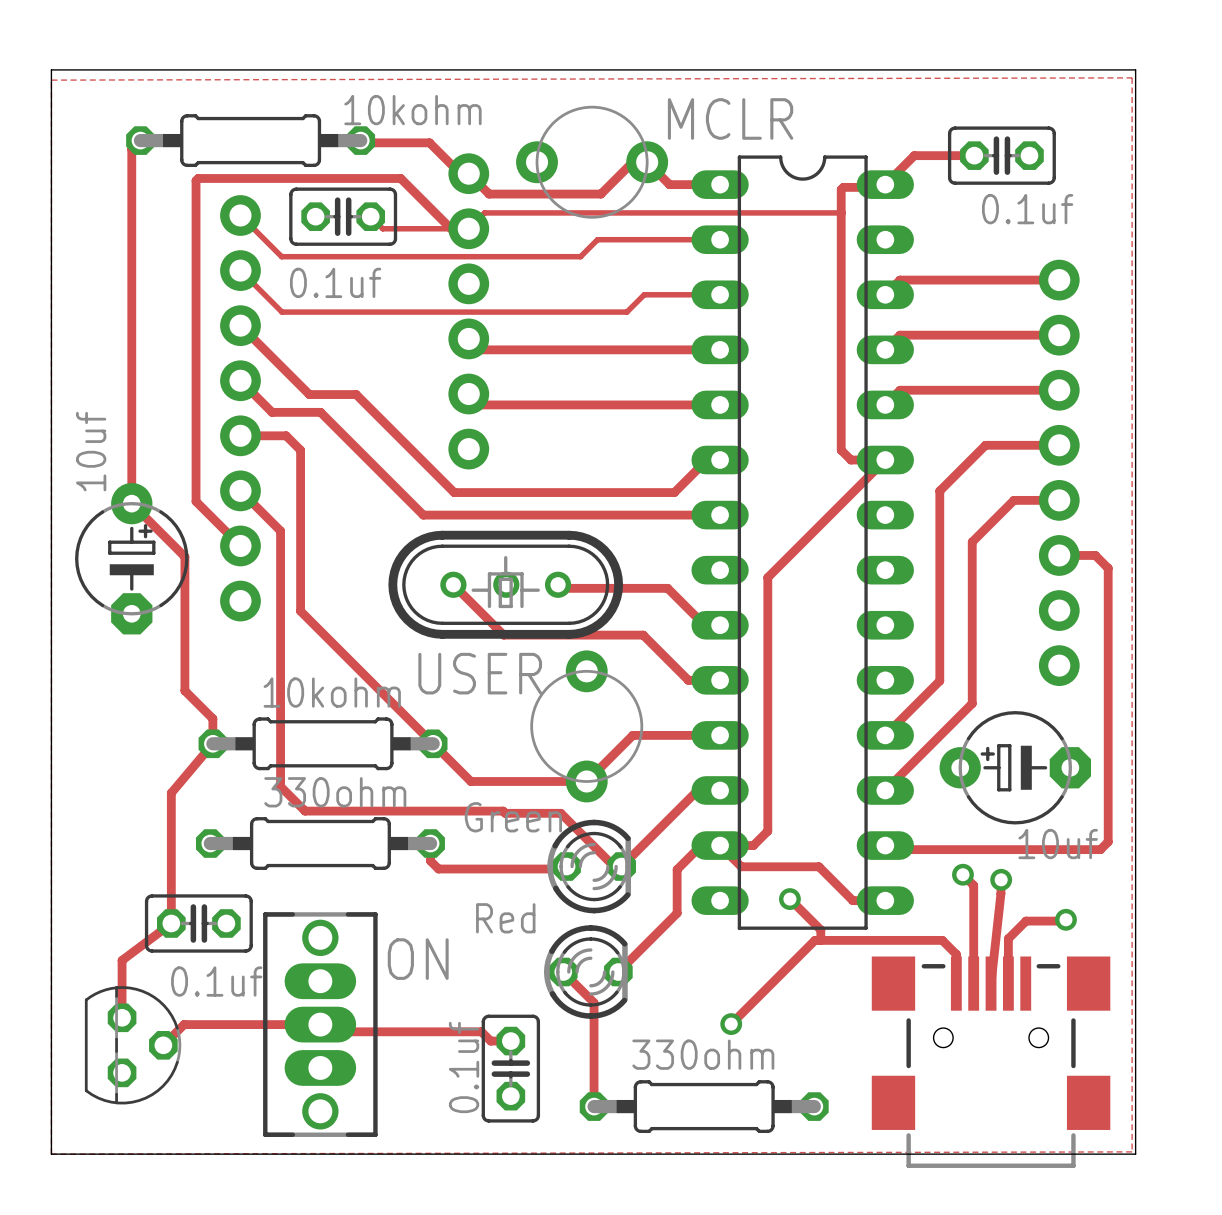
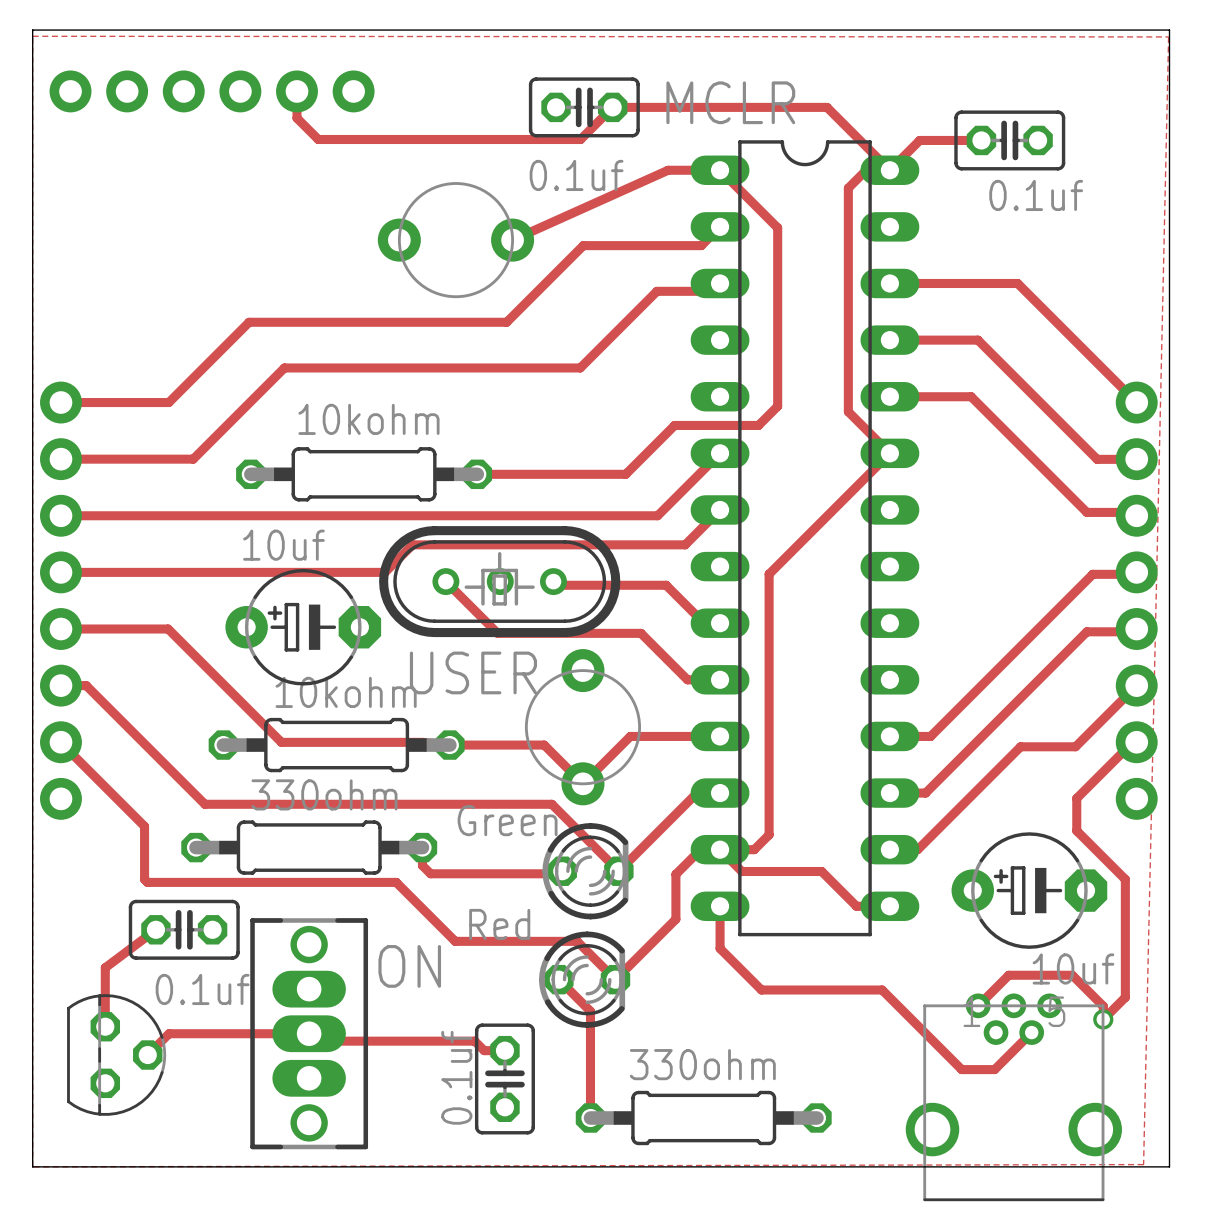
board edge: (51, 69) (1135, 69) (1135, 1154) -> (32, 52) (32, 30) (1169, 30) (1169, 1166) (1147, 1166)
zone outline: (51, 80) (1132, 77) (1132, 1151) -> (32, 62) (32, 36) (1168, 36) (1143, 1164)
track: (140, 140) (131, 149) (131, 503) (184, 556) (184, 690) (212, 718) (212, 743) (171, 793) (171, 923) -> none
part: 10kohm (250, 140) -> none
track: (360, 140) (363, 142) (429, 142) (464, 177) (468, 173) (489, 194) (600, 194) (632, 162) (647, 162) (669, 184) -> (512, 240) (668, 170)
part position: (592, 162) -> (455, 240)
track: none -> (720, 170) (777, 227) (777, 406) (758, 425) (674, 425) (625, 474) (477, 474)
track: (885, 184) (882, 187) (843, 187) (841, 189) (841, 450) (851, 460) (885, 460) -> (296, 91) (296, 118) (318, 139) (580, 139) (612, 107) (827, 107) (889, 170) (866, 170) (848, 188) (848, 411) (889, 453)
track: (841, 212) (484, 212) (468, 228) -> none
track: (240, 215) (281, 256) (580, 256) (597, 239) (720, 239) -> (60, 402) (168, 402) (249, 322) (506, 322) (583, 245) (701, 245) (720, 226)
part position: (343, 216) -> (584, 107)
track: (370, 216) (382, 228) (468, 228) -> none
track: (468, 228) (462, 239) (400, 178) (198, 178) (196, 180) (196, 501) (240, 545) -> none
track: (240, 270) (281, 312) (626, 312) (644, 294) (720, 294) -> (60, 459) (193, 459) (284, 367) (580, 367) (656, 291) (712, 291) (720, 283)
track: (1059, 280) (900, 280) (885, 294) -> (1136, 402) (1017, 283) (889, 283)
part rotation: 0° (468, 311) -> 90° clockwise (212, 91)
part position: (468, 311) -> (212, 91)
track: (240, 325) (309, 394) (356, 394) (454, 492) (674, 492) (706, 460) (720, 460) -> (60, 515) (657, 515) (720, 453)
track: (1059, 335) (900, 335) (885, 349) -> (1136, 459) (1097, 459) (977, 340) (889, 340)
track: (468, 338) (479, 349) (720, 349) -> none
track: (240, 380) (272, 412) (320, 412) (423, 515) (720, 515) -> (60, 572) (385, 572) (412, 544) (685, 544) (720, 509)
track: (1059, 390) (900, 390) (885, 404) -> (1136, 515) (1133, 512) (1086, 512) (971, 396) (889, 396)
track: (468, 394) (479, 404) (720, 404) -> none
part position: (240, 408) -> (60, 600)
track: (240, 435) (286, 435) (300, 450) (300, 611) (470, 781) (586, 781) -> (60, 629) (168, 629) (281, 742) (544, 745) (582, 783)
track: (1059, 445) (985, 445) (939, 491) (939, 680) (885, 735) -> (1136, 572) (1134, 574) (1092, 574) (930, 736) (889, 736)
part position: (1059, 472) -> (1136, 600)
part: none -> 10kohm (364, 474)
track: (240, 490) (280, 530) (280, 786) (305, 811) (503, 811) (505, 813) (560, 813) (614, 866) (621, 866) -> (60, 685) (86, 685) (204, 804) (551, 804) (618, 871)
track: (1059, 500) (1013, 500) (972, 542) (972, 703) (885, 790) -> (1136, 629) (1133, 631) (1086, 631) (925, 793) (889, 793)
track: (1059, 555) (1095, 555) (1108, 568) (1108, 841) (1100, 849) (889, 849) (885, 845) -> (1136, 685) (1075, 746) (1020, 746) (917, 849) (889, 849)
part rotation: 0° (131, 558) -> 90° counterclockwise (303, 627)
part position: (131, 558) -> (303, 627)
track: none -> (60, 742) (144, 826) (144, 879) (147, 882) (396, 882) (455, 941) (577, 941) (615, 979)
track: none -> (1136, 742) (1132, 742) (1076, 798) (1076, 830) (1125, 879) (1125, 997) (1103, 1019) (1103, 1006) (1072, 975) (1008, 975) (978, 1005)
part position: (323, 743) -> (336, 745)
part position: (1015, 767) -> (1029, 890)
track: (962, 874) (973, 885) (973, 983) -> none
via: (962, 874) -> none
track: (1001, 879) (991, 983) -> none
via: (1001, 879) -> none
track: (789, 899) (820, 929) (820, 940) -> none
via: (789, 899) -> none
track: none -> (720, 906) (720, 948) (761, 990) (882, 990) (961, 1069) (994, 1069) (1031, 1032)
track: (1065, 919) (1026, 921) (1008, 938) (1008, 983) -> none
via: (1065, 919) -> none
track: (956, 983) (956, 954) (942, 940) (814, 940) (731, 1024) -> none
via: none -> (1103, 1019)
via: (731, 1024) -> none
part: (991, 1062) -> none
part: none -> (1013, 1097)

